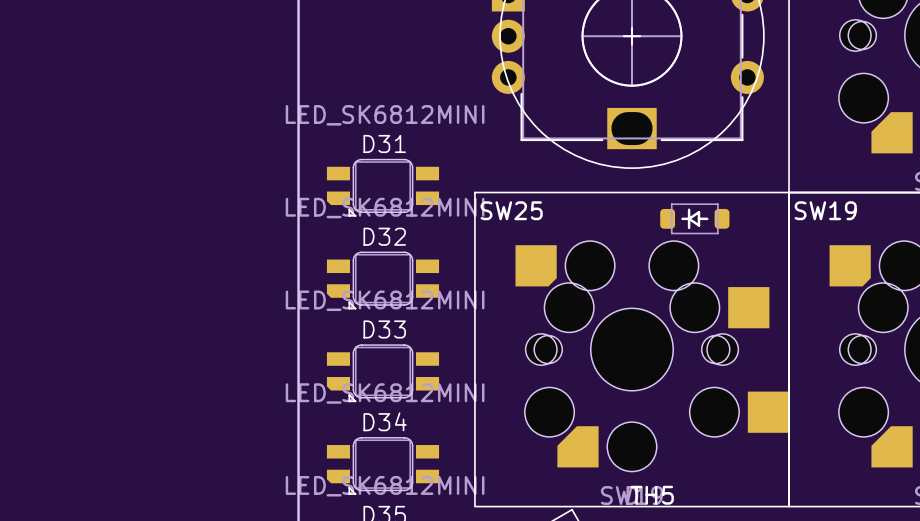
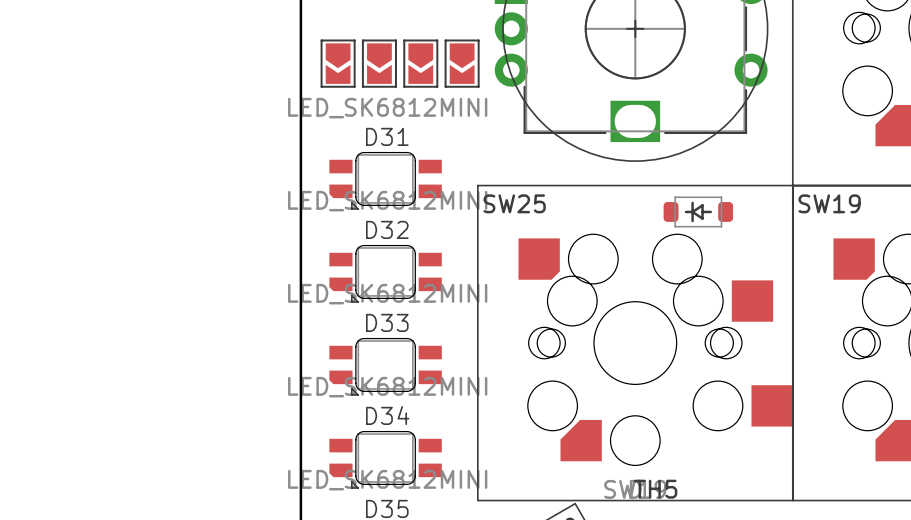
part: none -> (338, 63)
part: none -> (379, 63)
part: none -> (420, 63)
part: none -> (462, 63)

